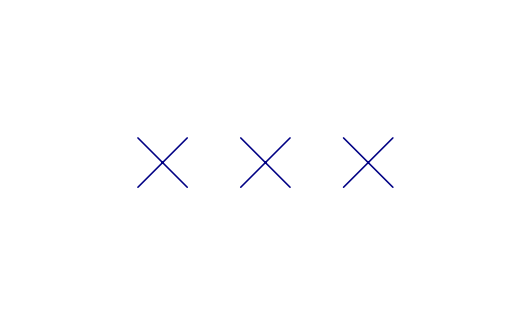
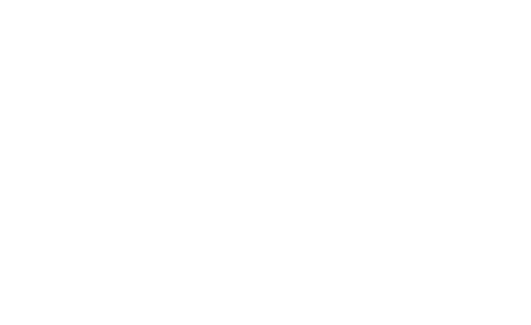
no-connect mark: (162, 162) -> none
no-connect mark: (265, 162) -> none
no-connect mark: (368, 162) -> none

